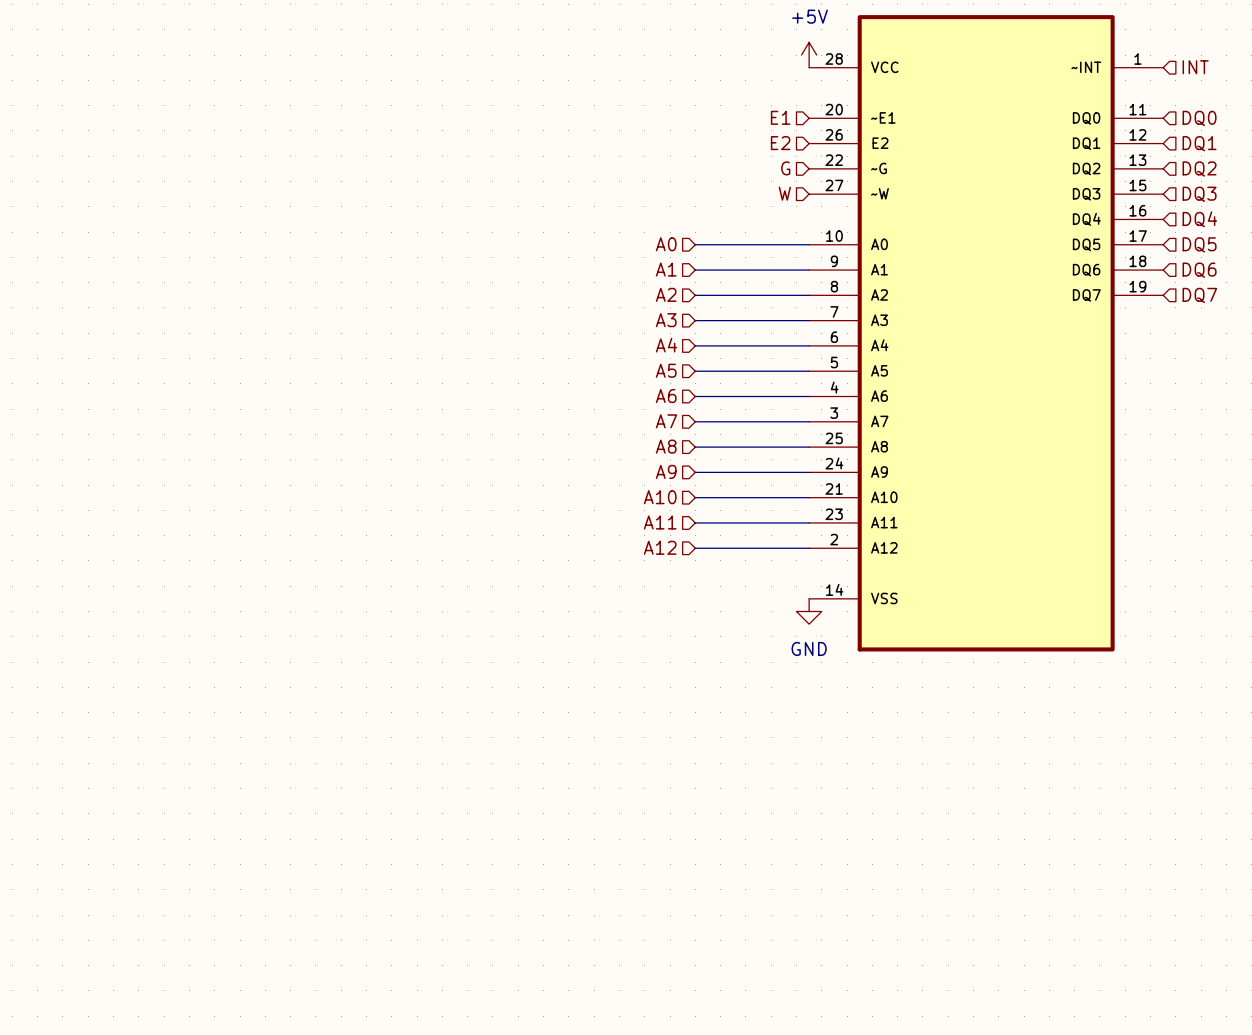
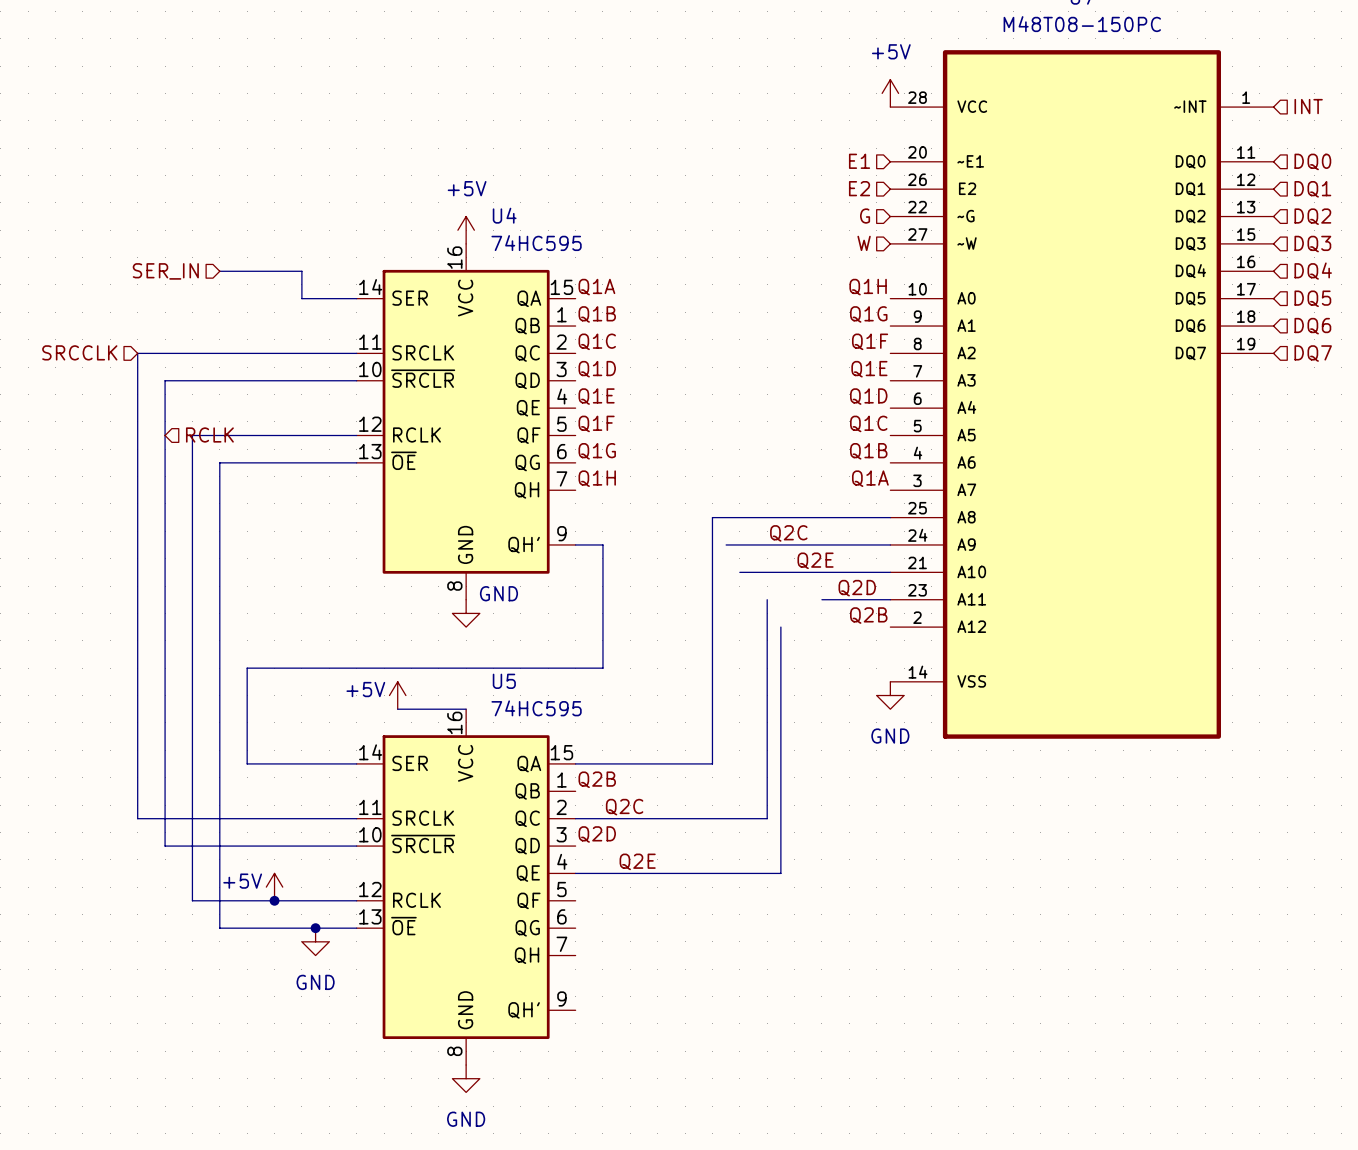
power symbol: none -> +5V (466, 230)
hierarchical label: none -> SER_IN (165, 271)
wire: none -> (219, 271) (301, 271) (301, 298) (356, 298)
label: none -> Q1A (596, 287)
label: none -> Q1H (868, 287)
hierarchical label: A0 (666, 244) -> none
wire: (695, 244) (809, 244) -> none
label: none -> Q1B (597, 314)
label: none -> Q1G (868, 314)
hierarchical label: A1 (666, 269) -> none
wire: (695, 270) (809, 270) -> none
label: none -> Q1C (597, 341)
label: none -> Q1F (870, 341)
hierarchical label: none -> SRCCLK (79, 352)
hierarchical label: A2 (666, 294) -> none
wire: none -> (356, 353) (137, 353) (137, 818) (356, 818)
wire: (695, 295) (809, 295) -> none
label: none -> Q1D (597, 369)
label: none -> Q1E (869, 369)
wire: none -> (356, 380) (165, 380) (165, 846) (356, 846)
hierarchical label: A3 (666, 320) -> none
wire: (695, 320) (809, 320) -> none
label: none -> Q1E (596, 396)
label: none -> Q1D (868, 396)
hierarchical label: A4 (666, 345) -> none
wire: (695, 345) (809, 345) -> none
U4: none -> 74HC595 (466, 421)
label: none -> Q1F (596, 423)
label: none -> Q1C (868, 423)
hierarchical label: none -> RCLK (209, 434)
hierarchical label: A5 (666, 370) -> none
wire: none -> (356, 435) (192, 435) (192, 900) (356, 900)
wire: (695, 371) (809, 371) -> none
label: none -> Q1G (597, 451)
label: none -> Q1B (868, 451)
wire: none -> (356, 462) (219, 462) (219, 928) (356, 928)
hierarchical label: A6 (666, 396) -> none
wire: (695, 396) (809, 396) -> none
label: none -> Q1H (597, 478)
label: none -> Q1A (870, 478)
hierarchical label: A7 (666, 421) -> none
wire: (695, 421) (809, 421) -> none
hierarchical label: A8 (666, 446) -> none
wire: none -> (767, 517) (712, 517) (712, 763) (575, 763)
label: none -> Q2C (788, 533)
hierarchical label: A9 (666, 471) -> none
wire: none -> (575, 544) (602, 544) (602, 668) (247, 668) (247, 763) (356, 763)
wire: none -> (726, 544) (767, 544)
label: none -> Q2E (815, 560)
hierarchical label: A10 (660, 497) -> none
wire: none -> (739, 572) (767, 572)
label: none -> Q2D (857, 588)
hierarchical label: A11 (660, 522) -> none
wire: (695, 522) (745, 522) -> (767, 599) (767, 818) (575, 818)
power symbol: none -> GND (466, 613)
label: none -> Q2B (868, 615)
hierarchical label: A12 (660, 547) -> none
wire: (695, 548) (809, 548) -> none
wire: none -> (780, 627) (780, 873) (575, 873)
power symbol: none -> +5V (397, 695)
wire: none -> (397, 709) (466, 709)
label: none -> Q2B (597, 779)
label: none -> Q2C (624, 807)
label: none -> Q2D (597, 834)
label: none -> Q2E (637, 861)
power symbol: none -> +5V (274, 887)
U5: none -> 74HC595 (466, 887)
junction: none -> (274, 900)
junction: none -> (315, 928)
power symbol: none -> GND (315, 941)
power symbol: none -> GND (466, 1078)

